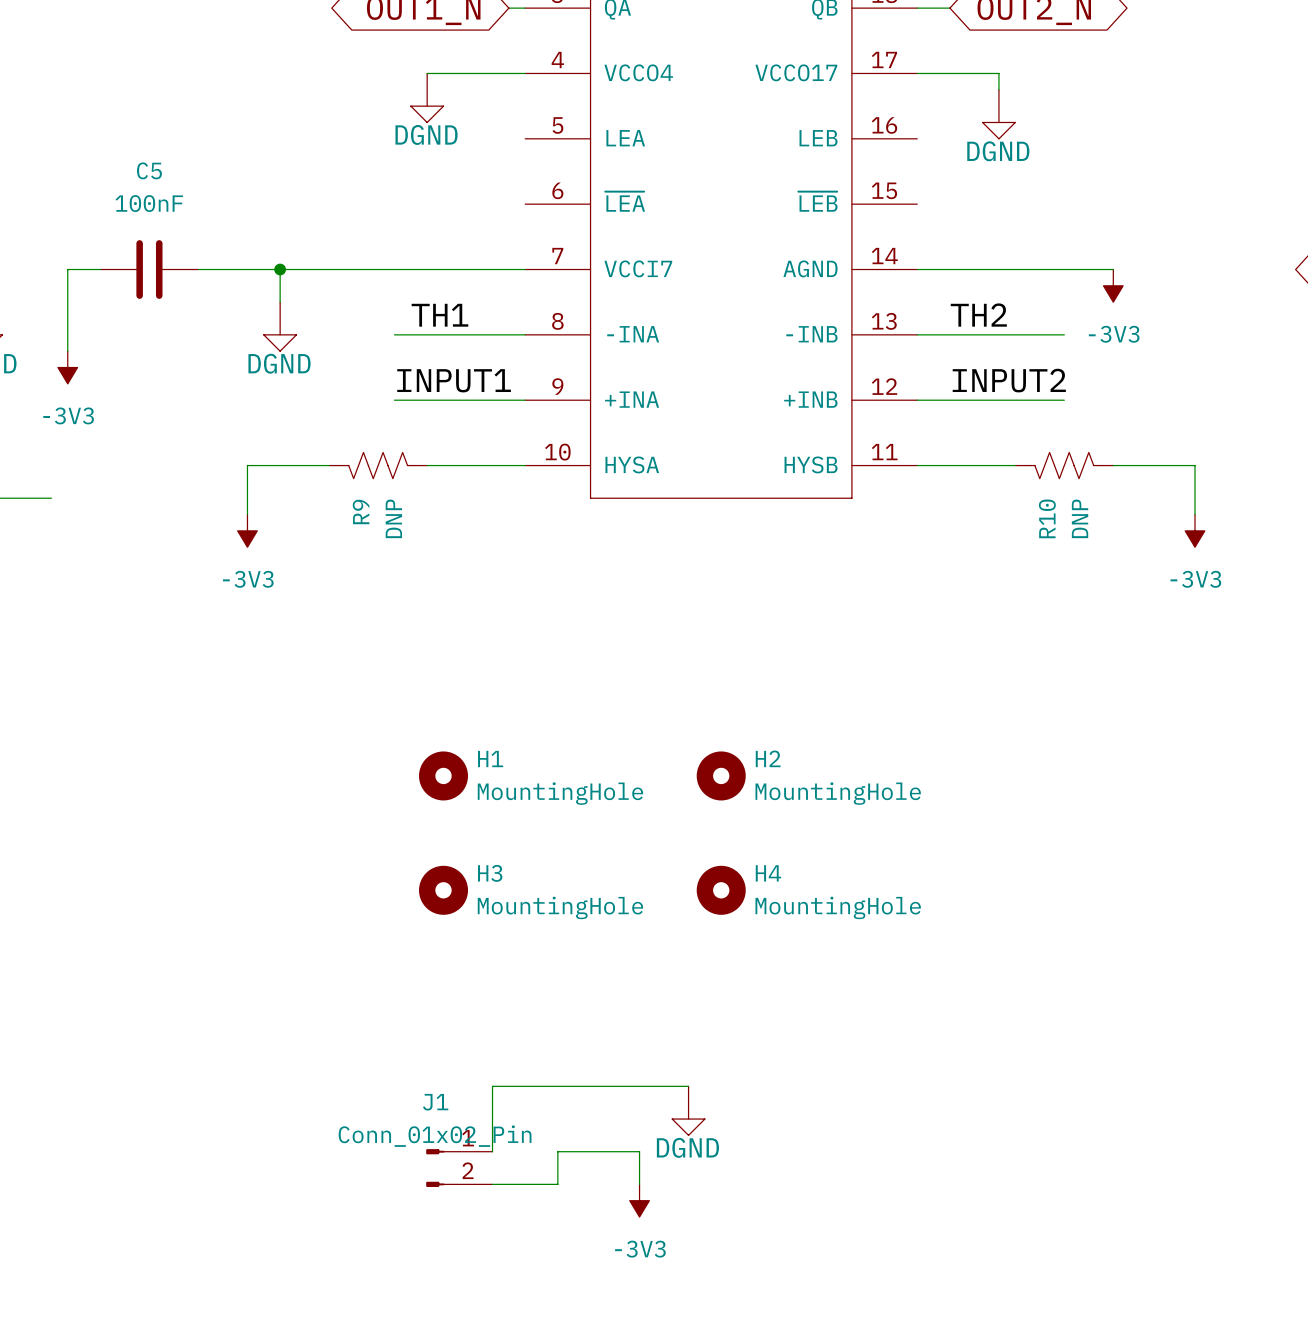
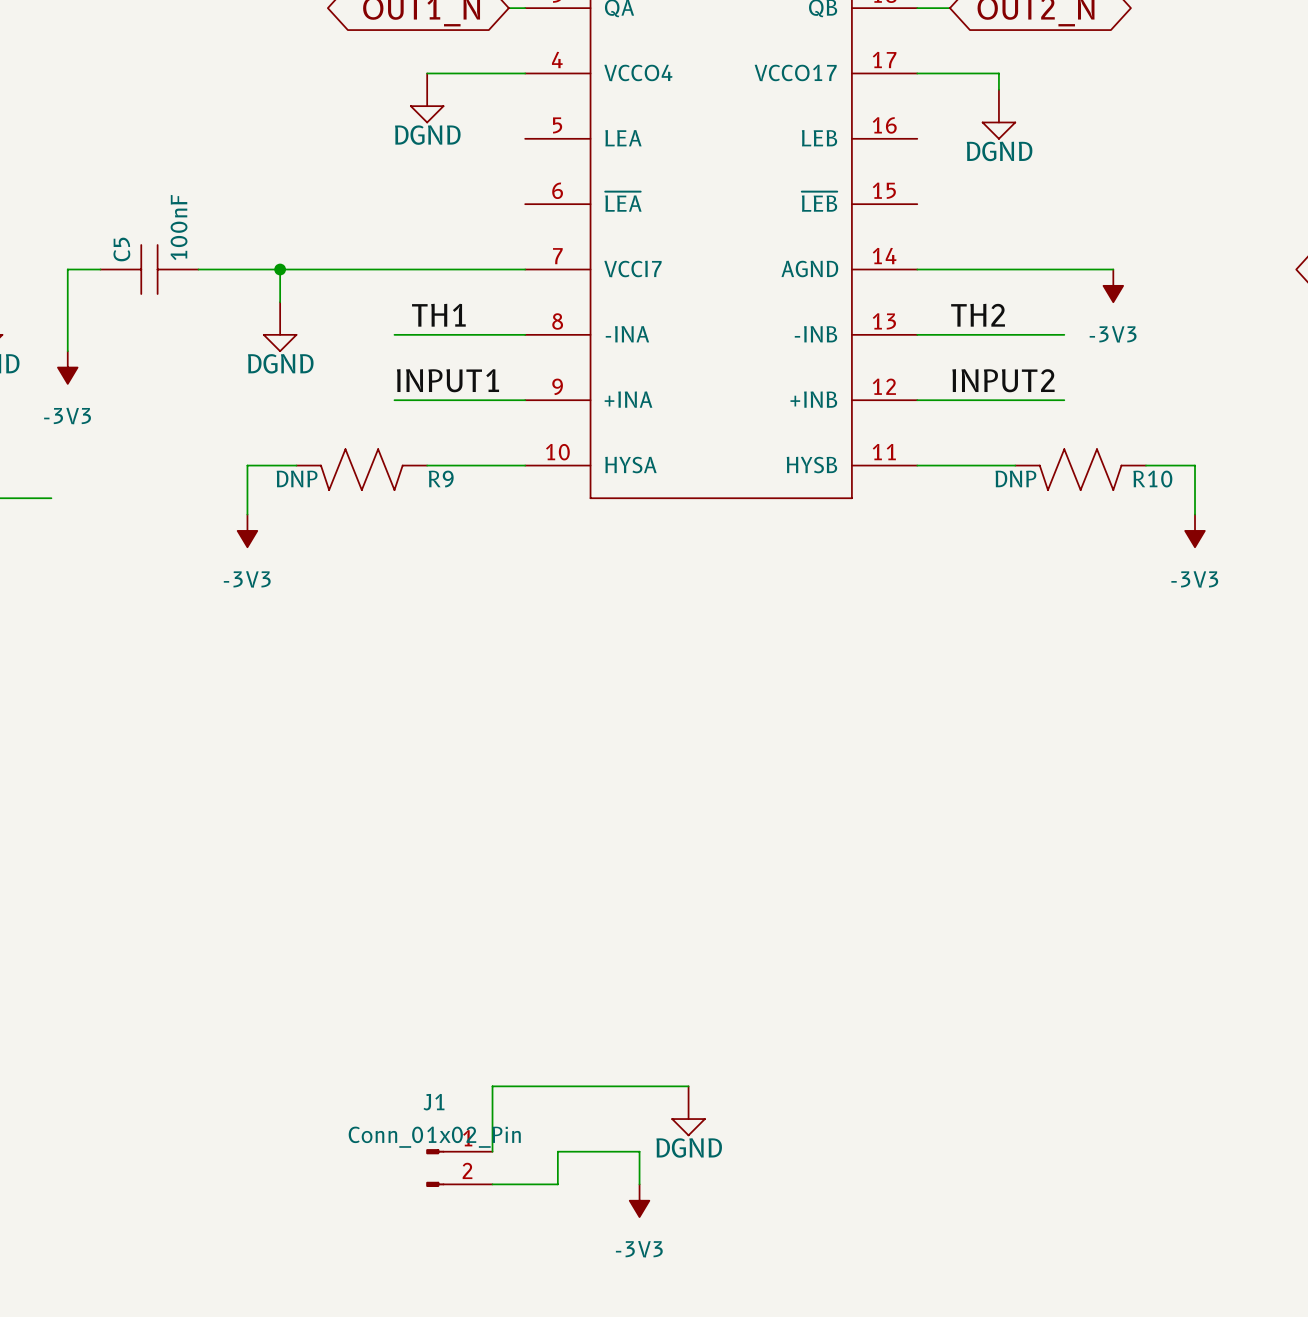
C5 name position: C5 (149, 170) -> C5 (121, 249)
C5 value position: 100nF (149, 203) -> 100nF (179, 227)
C5 symbol: [100, 240, 199, 299] -> [100, 245, 199, 295]
R9 symbol: [329, 452, 428, 479] -> [296, 449, 428, 491]
R10 symbol: [1015, 452, 1114, 479] -> [1015, 449, 1146, 491]
R9 name position: R9 (361, 511) -> R9 (441, 479)
R9 value position: DNP (393, 518) -> DNP (297, 478)
R10 name position: R10 (1047, 518) -> R10 (1152, 479)
R10 value position: DNP (1080, 518) -> DNP (1015, 478)
H1: MountingHole (443, 775) -> none
H2: MountingHole (721, 775) -> none
H3: MountingHole (443, 890) -> none
H4: MountingHole (721, 890) -> none

